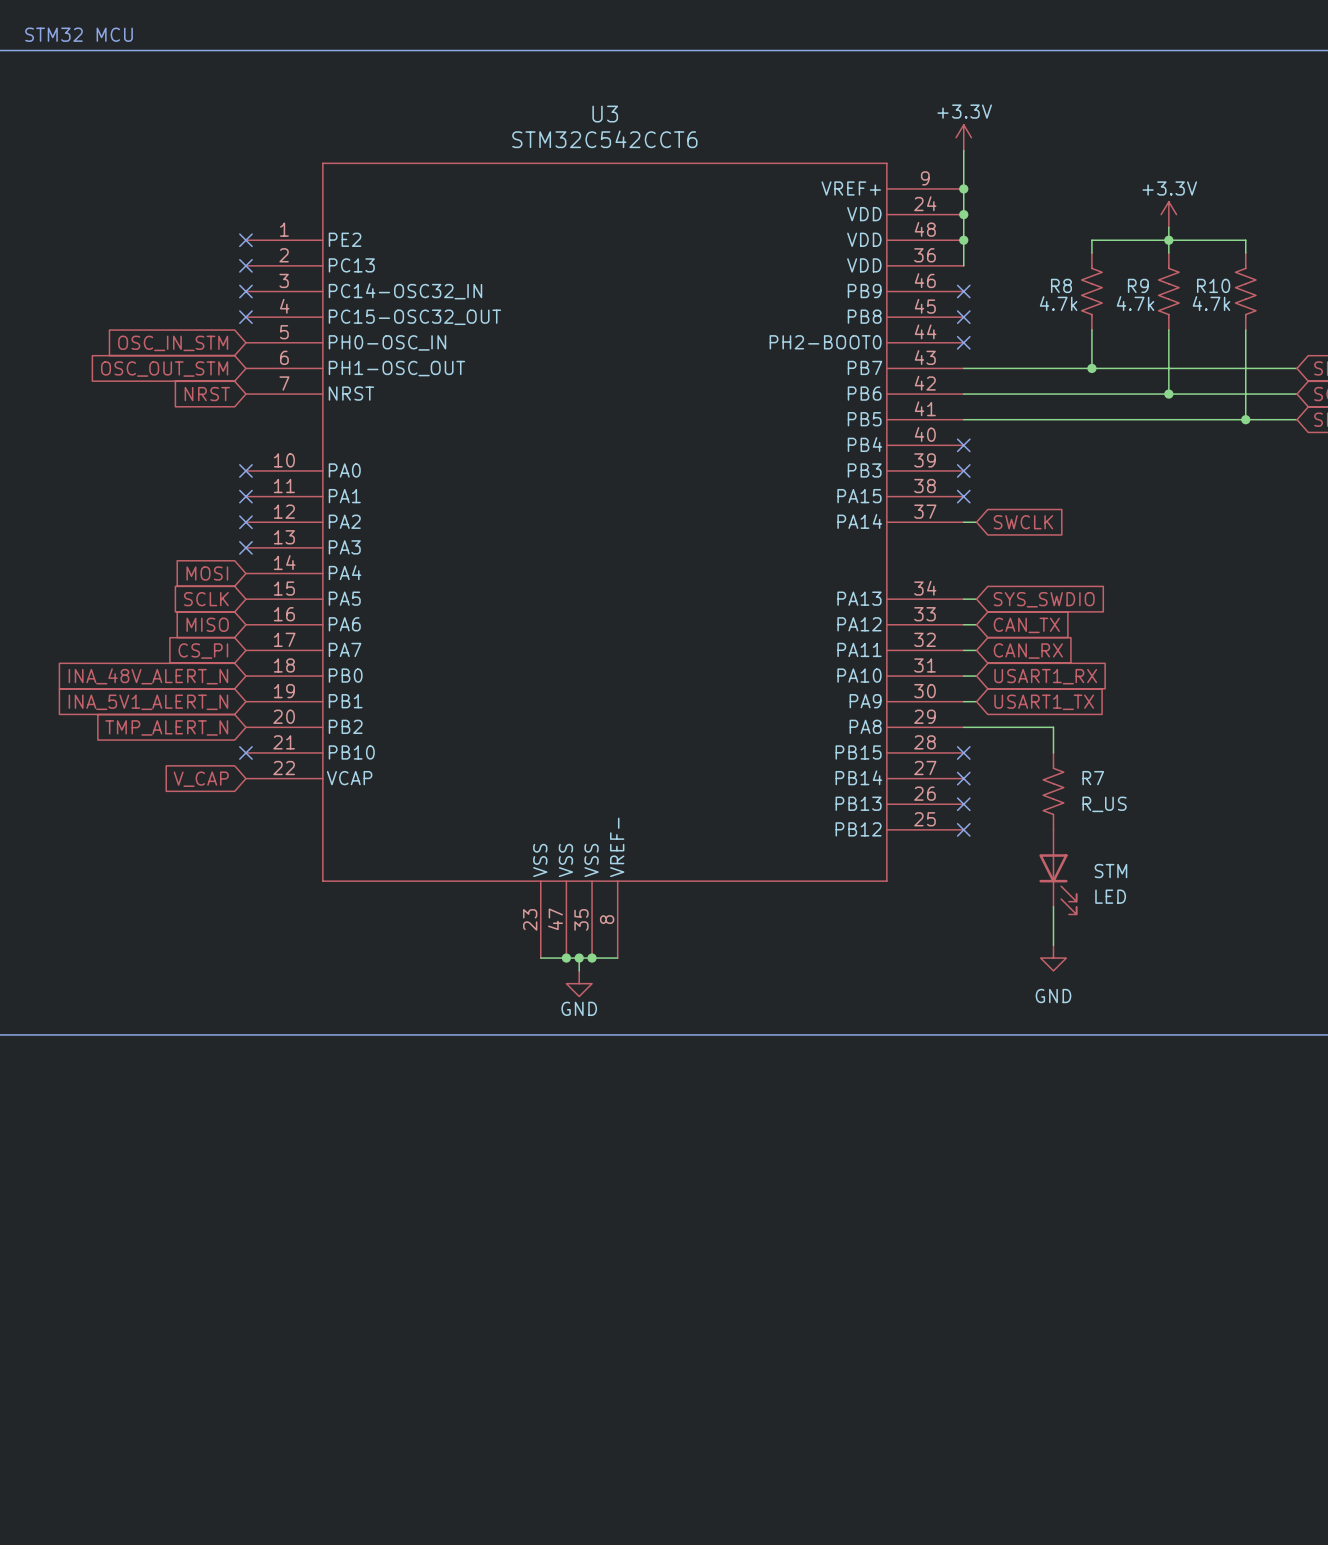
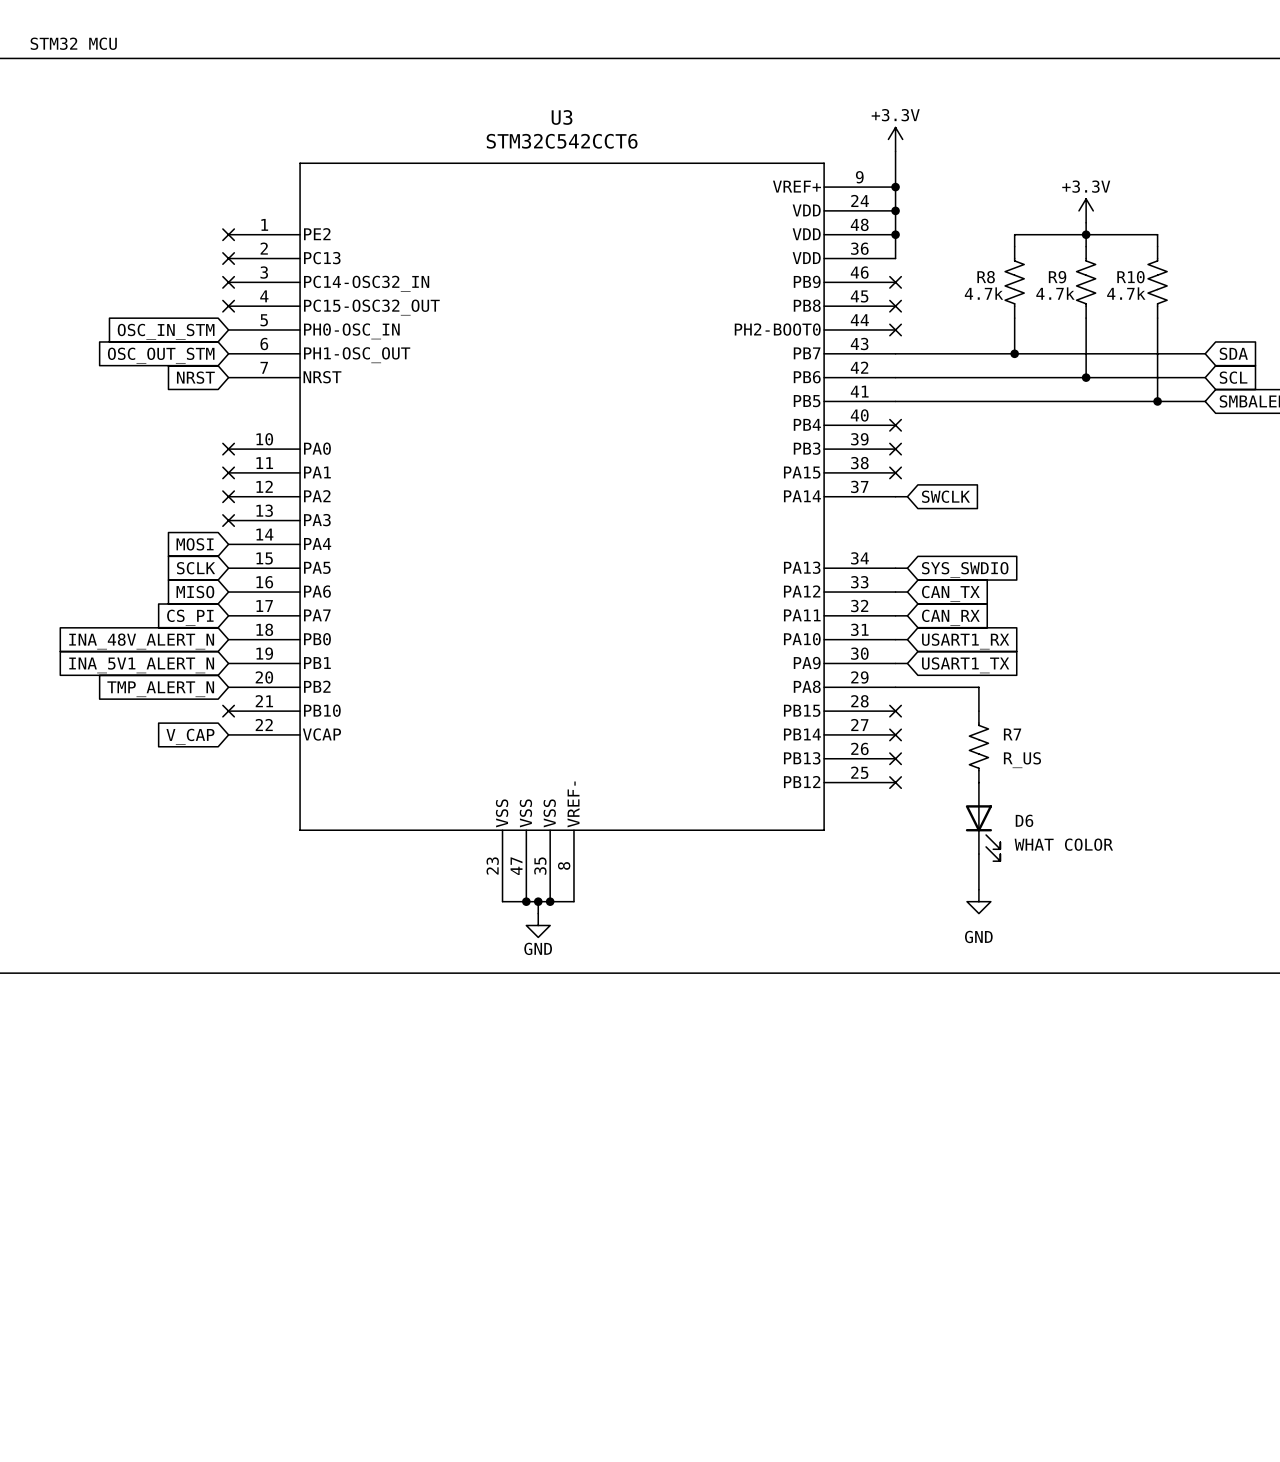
STM name: STM (1110, 871) -> D6 (1024, 820)
STM value: LED (1110, 896) -> WHAT COLOR (1063, 844)

